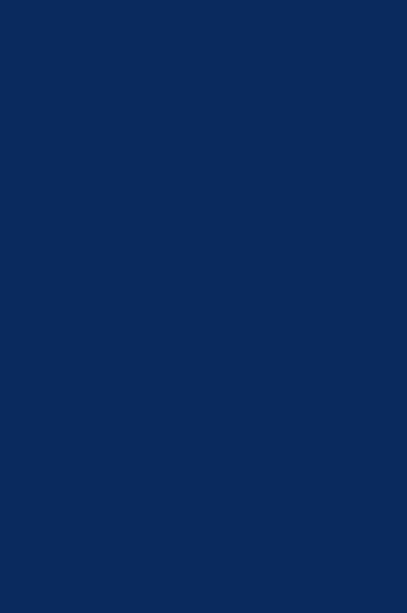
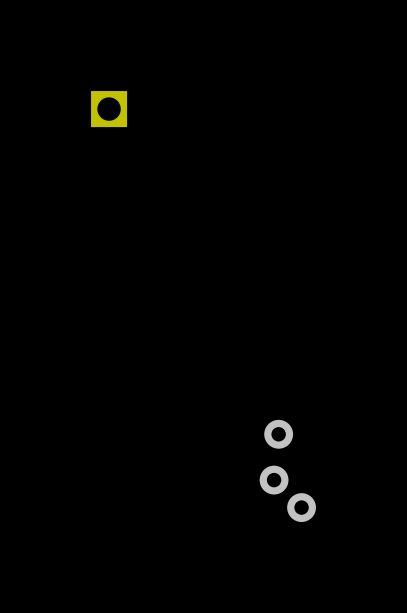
part: none -> (109, 109)
via: none -> (278, 434)
via: none -> (274, 480)
via: none -> (301, 507)

